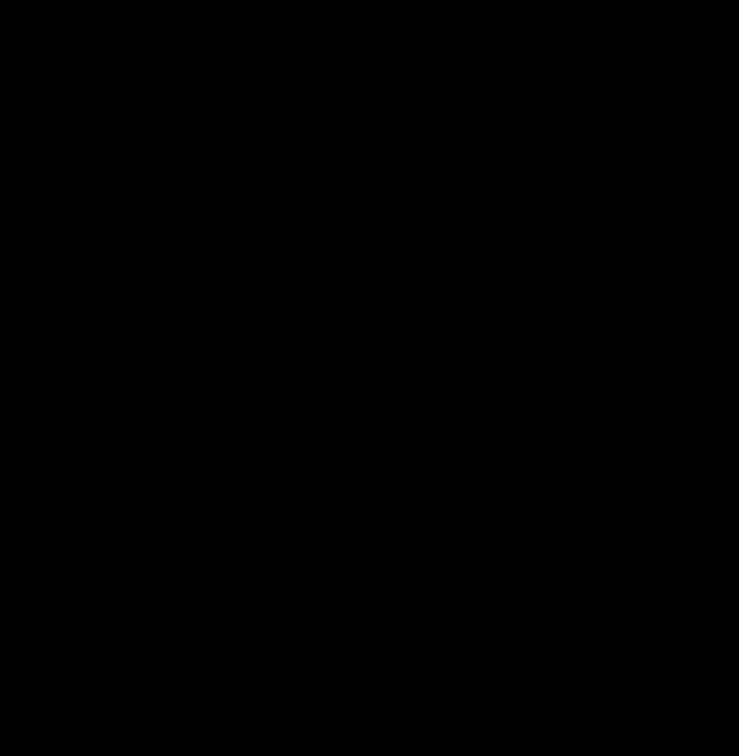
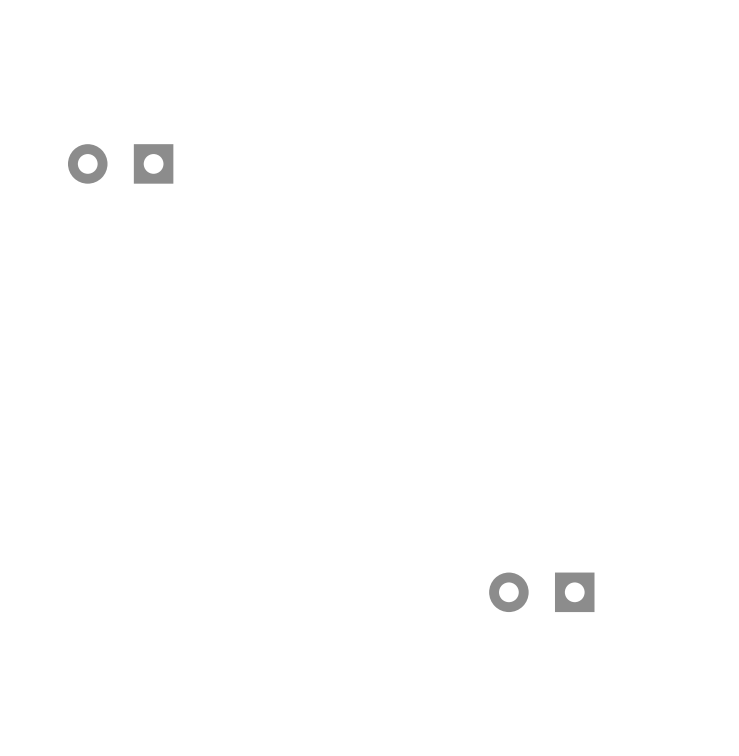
part: none -> (120, 163)
part: none -> (541, 592)

